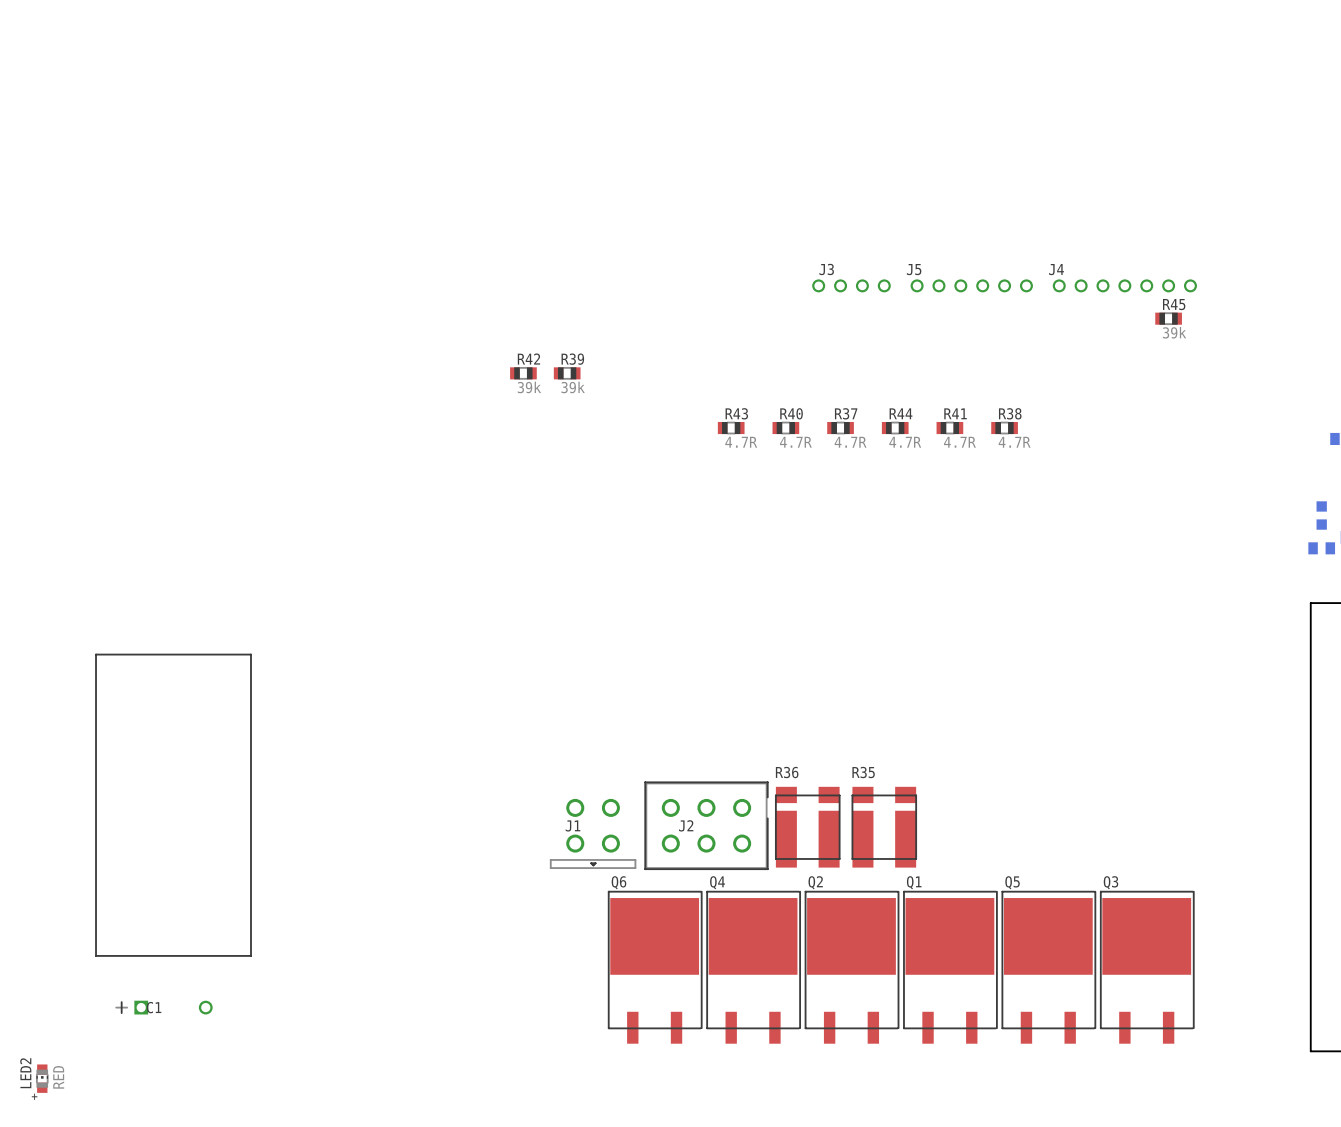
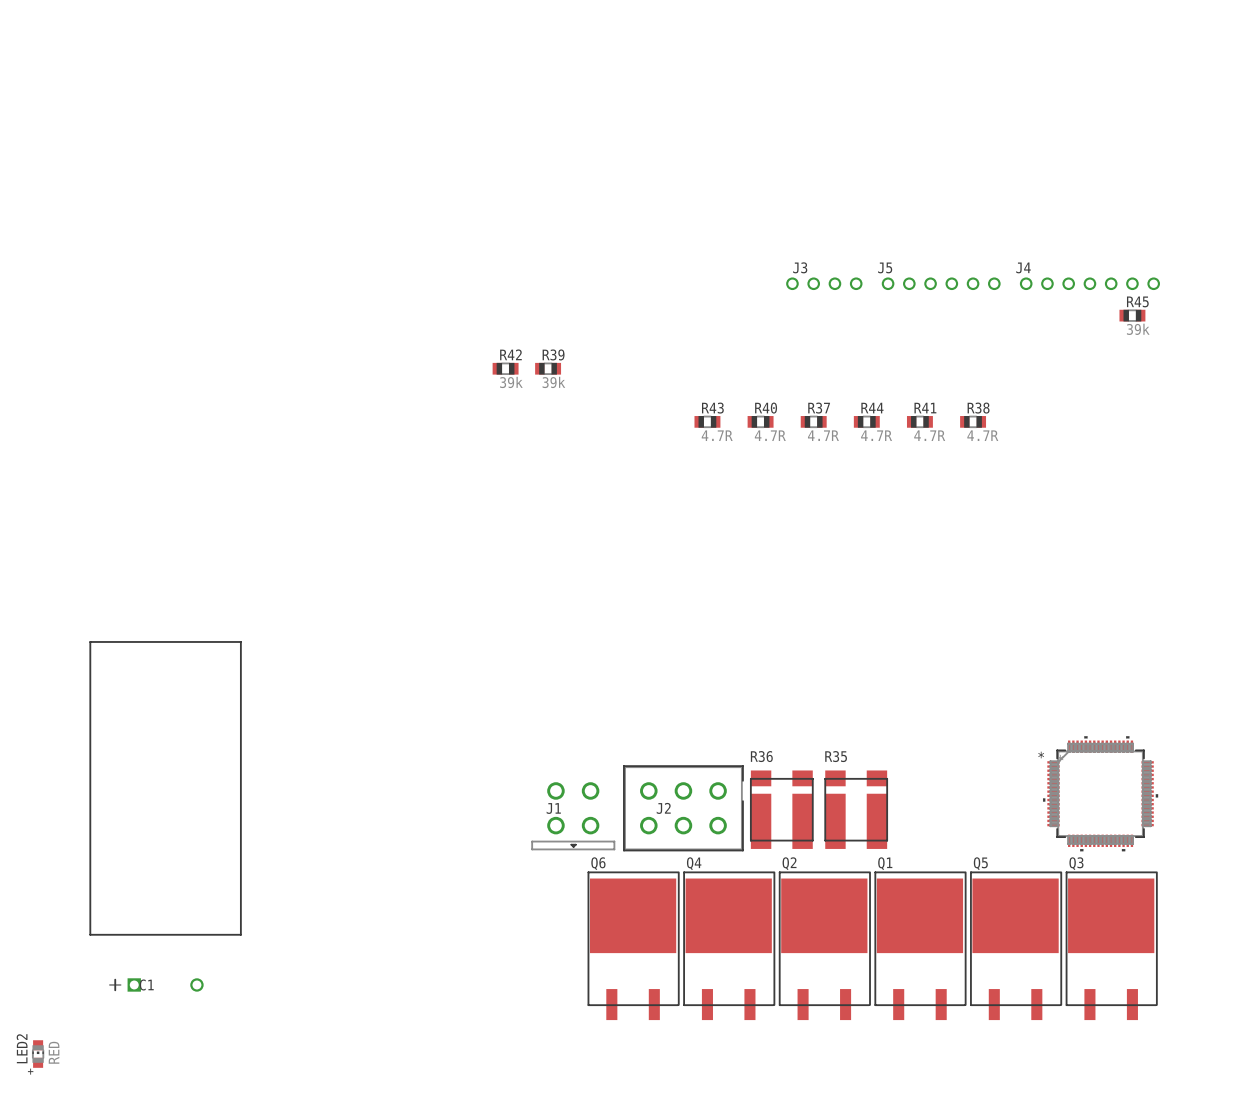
part: none -> (1100, 793)

